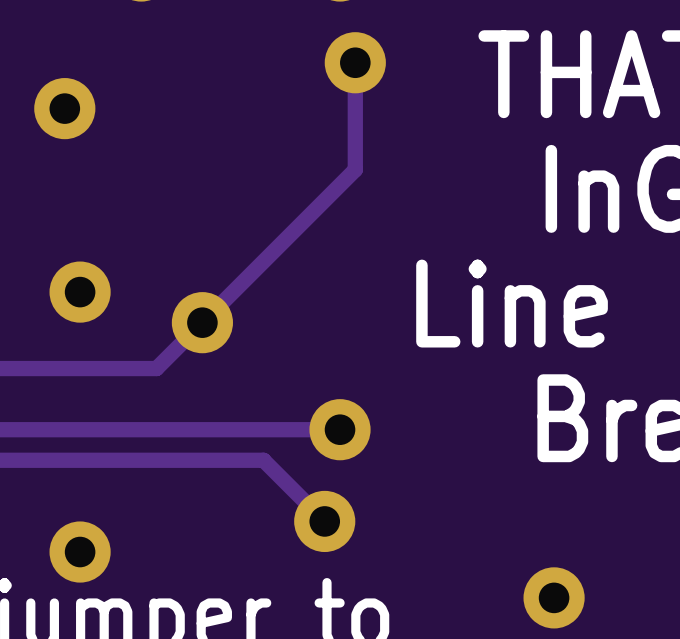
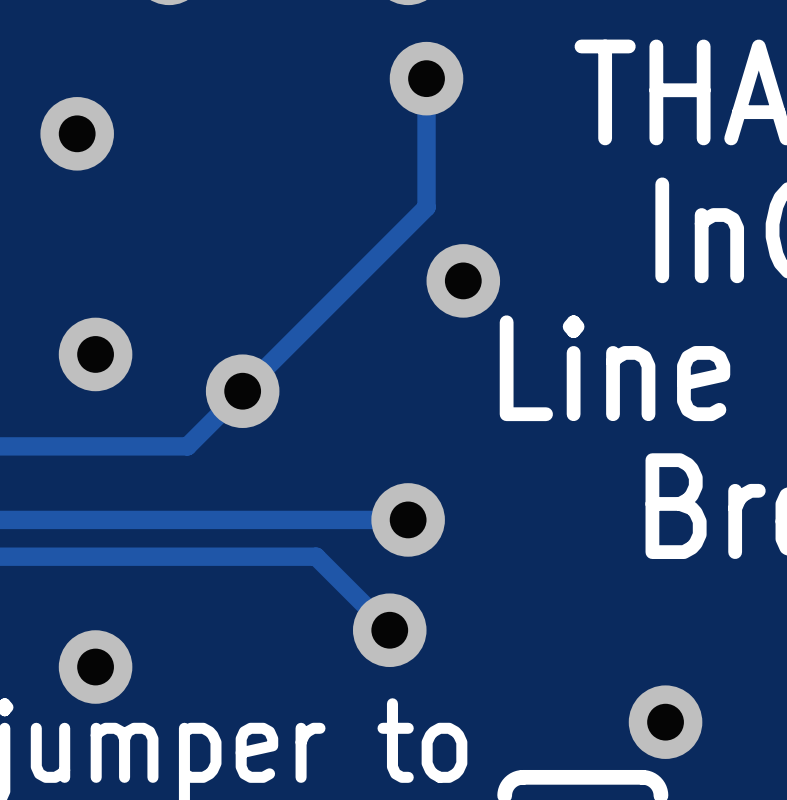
via: none -> (463, 280)

